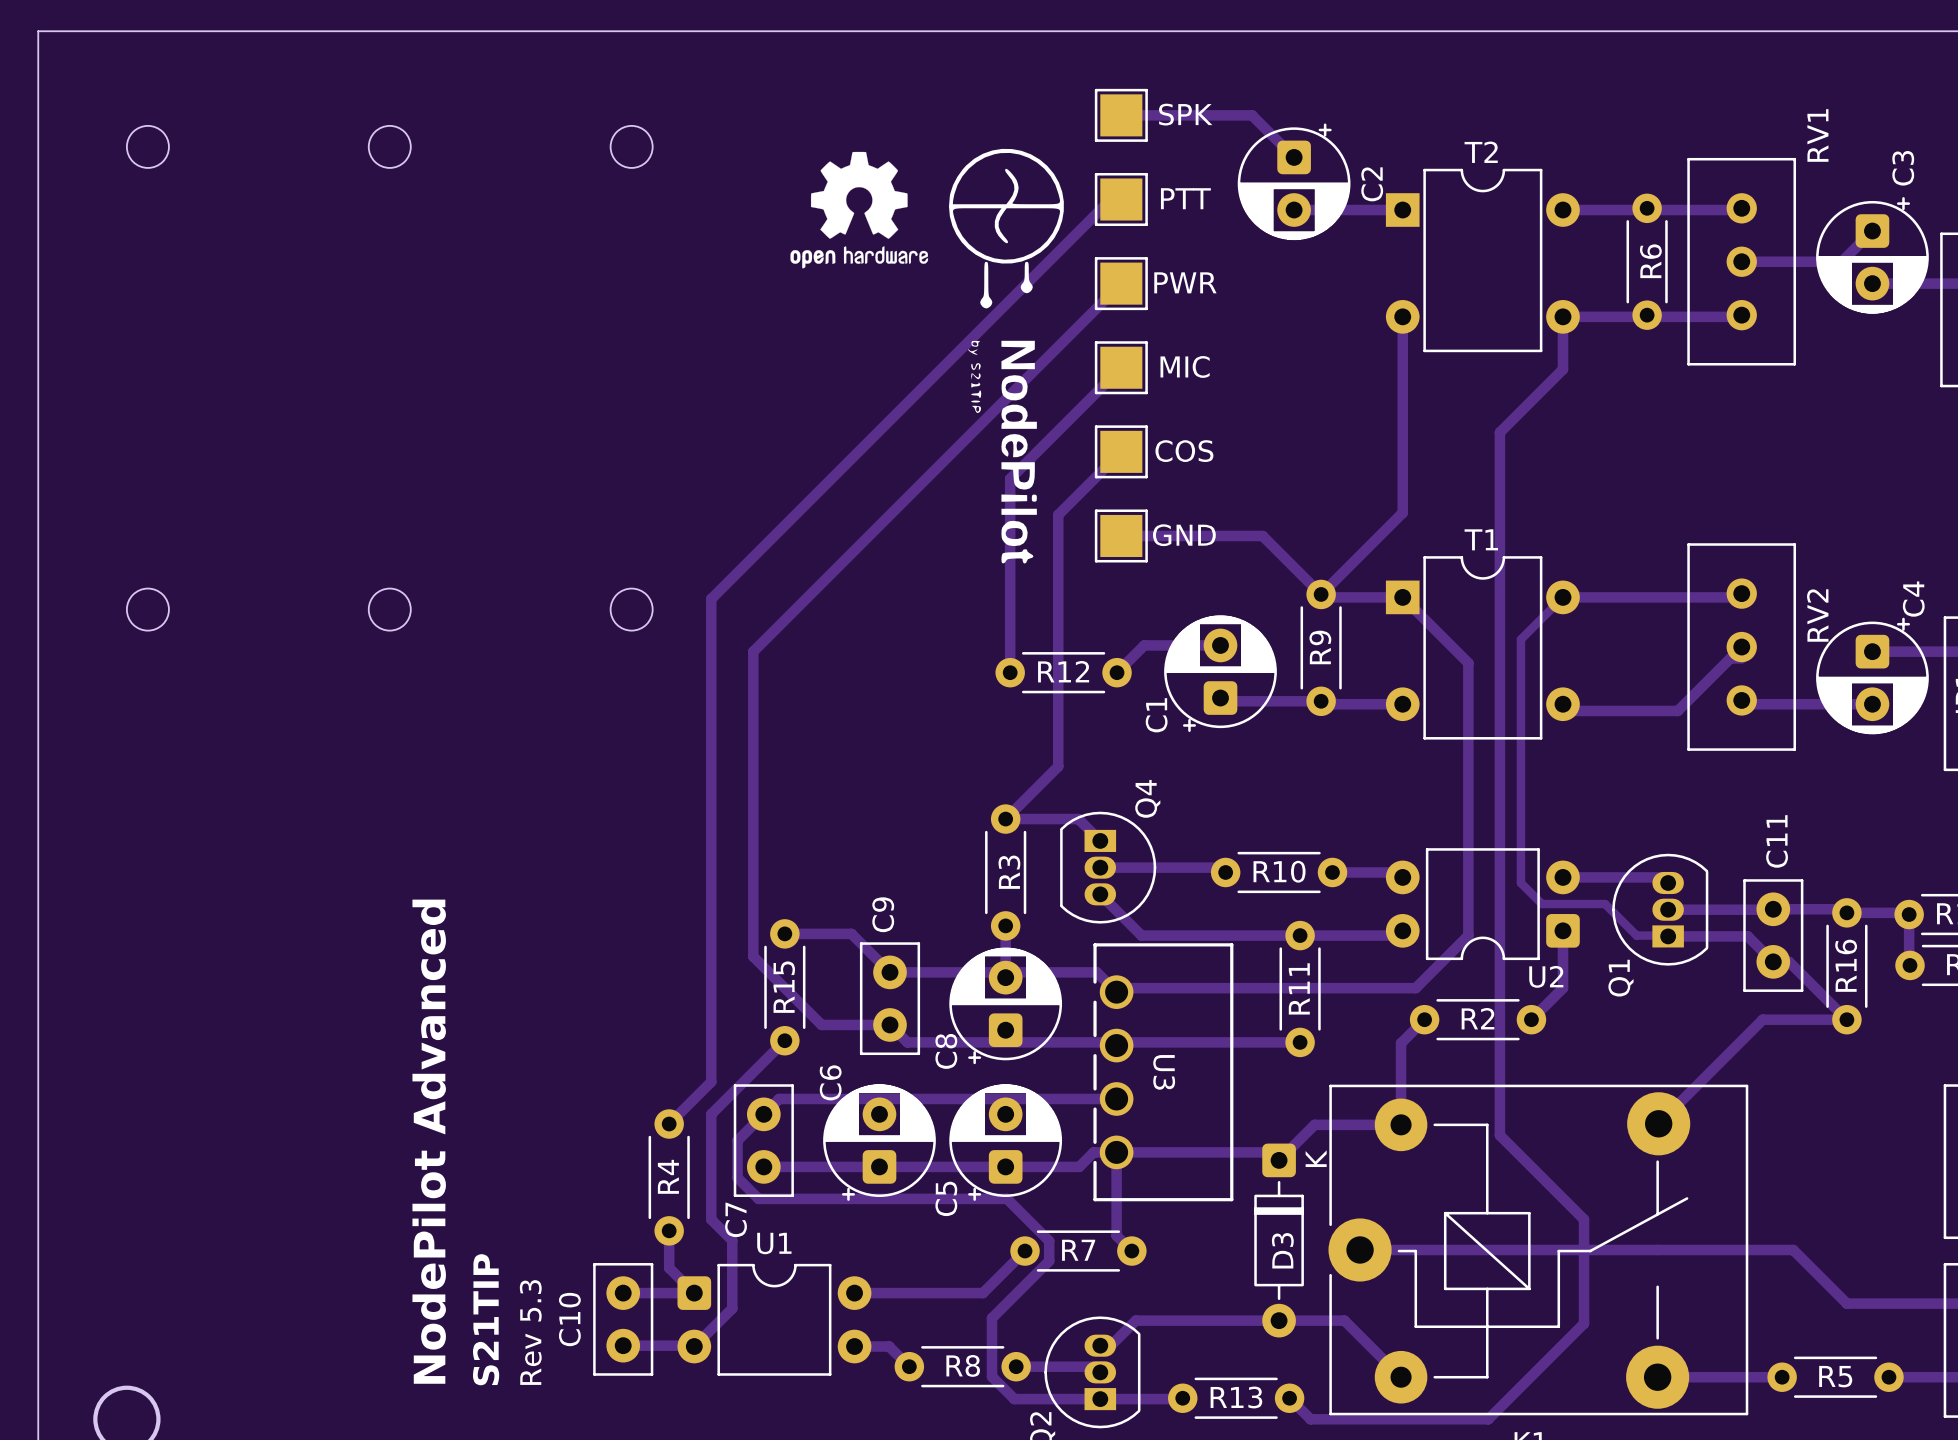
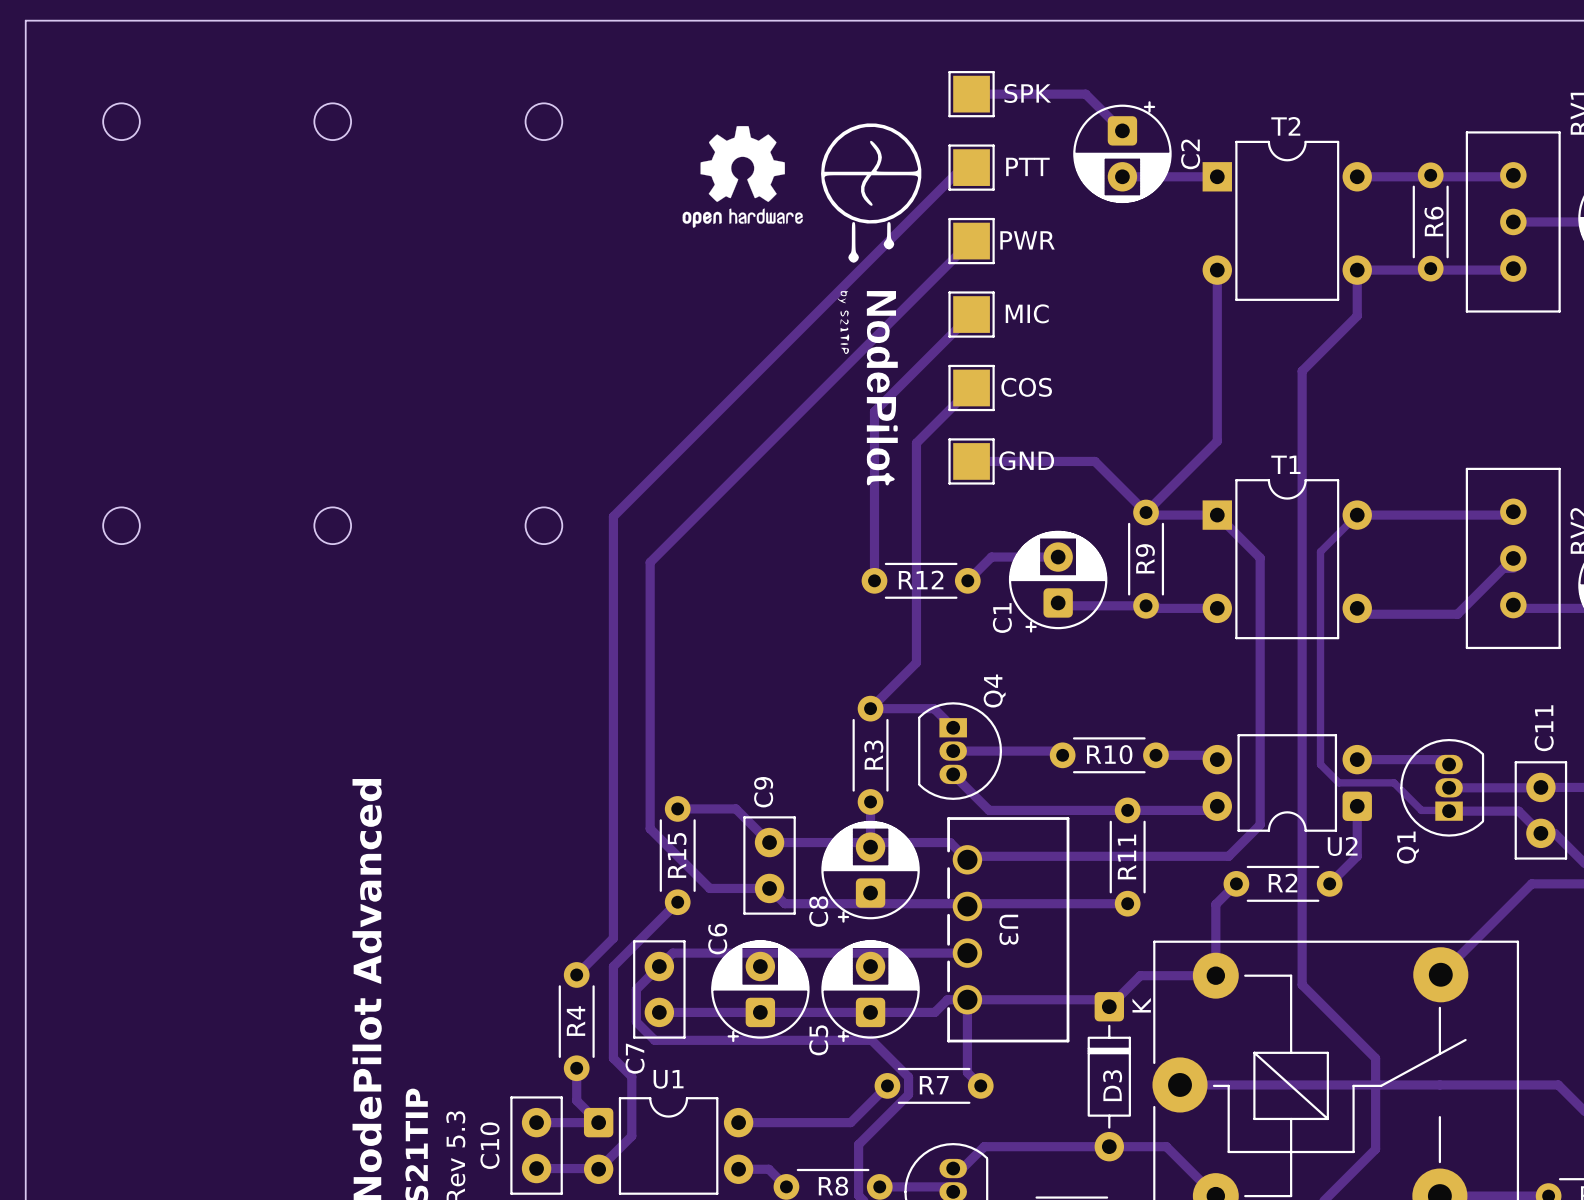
track: (1451, 646) (1468, 663) (1468, 935) (1451, 952) -> (1260, 557) (1260, 824)

